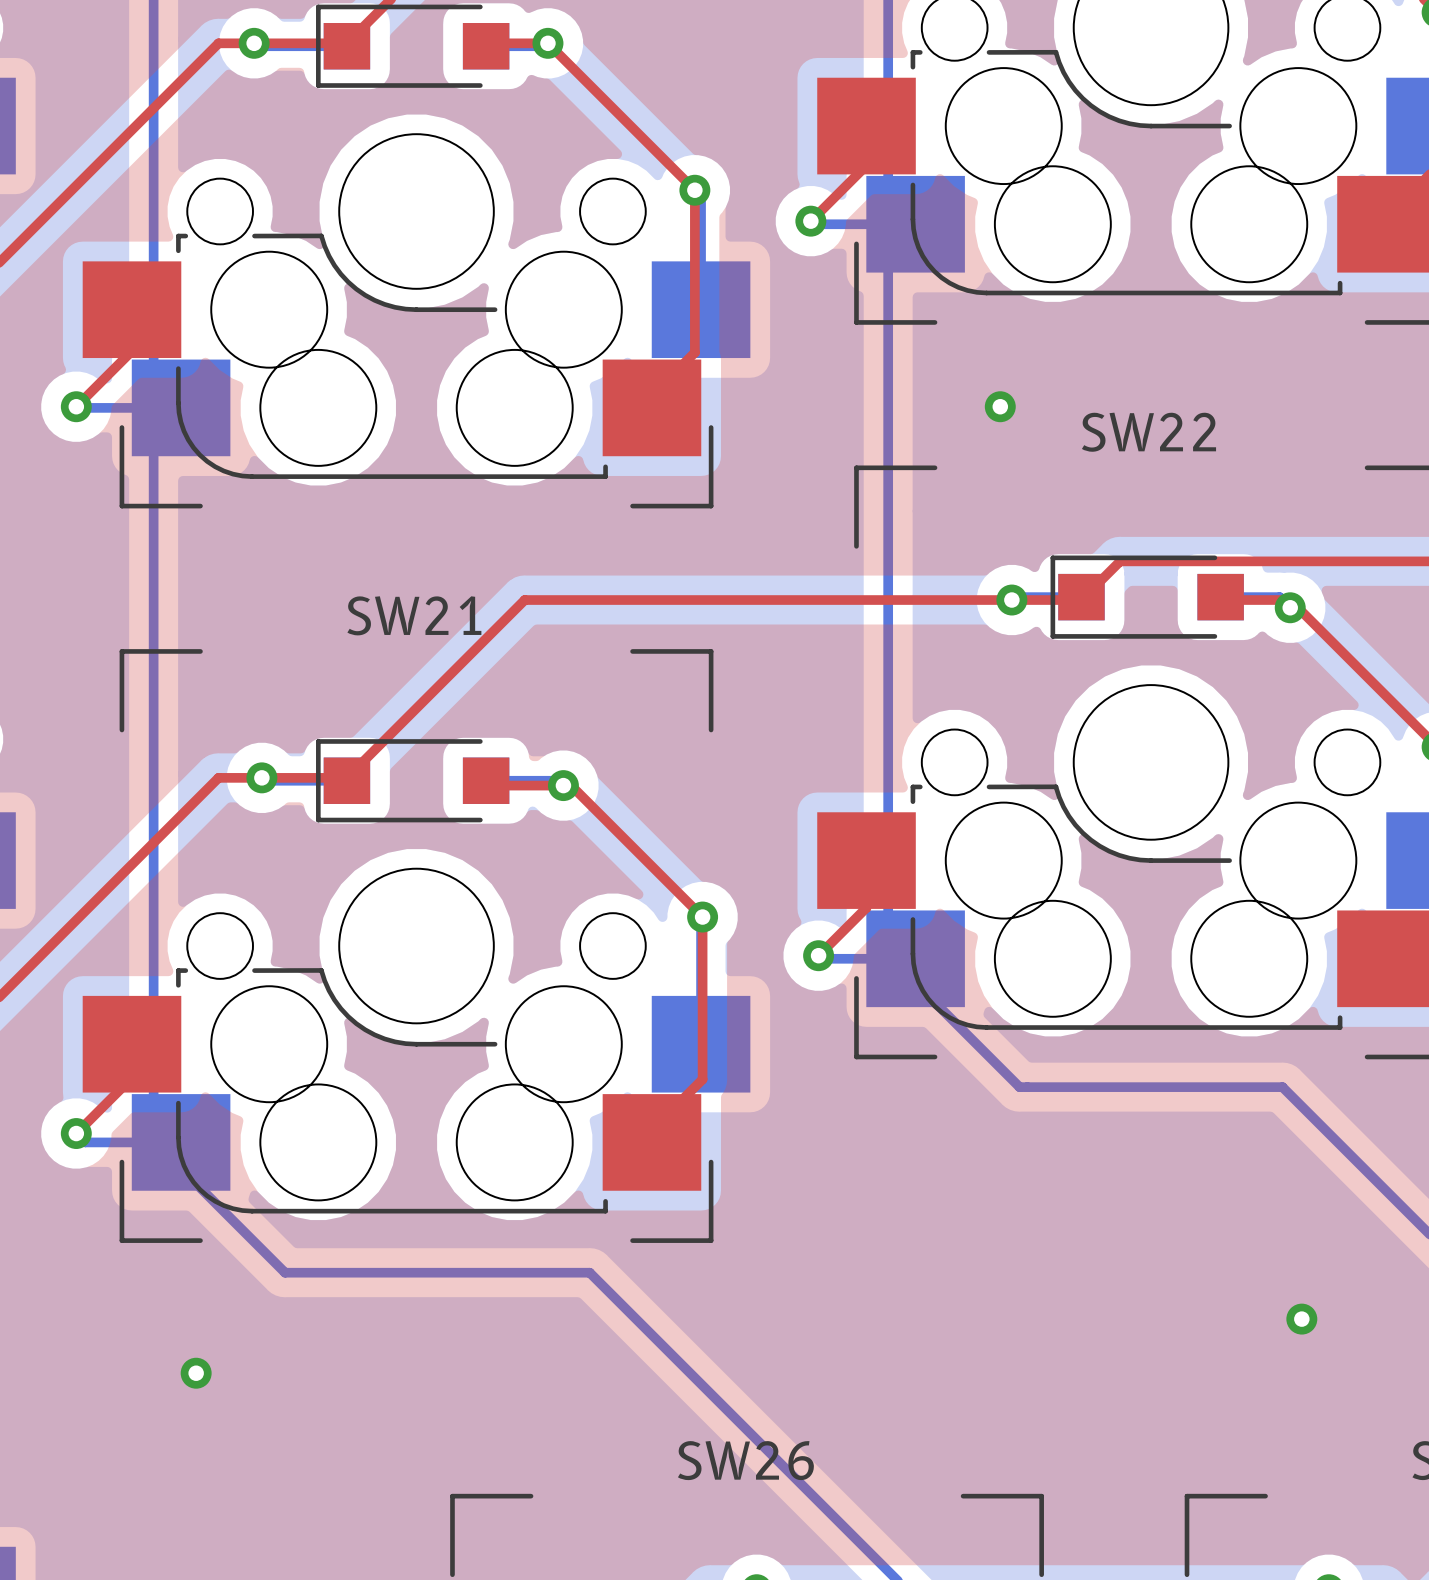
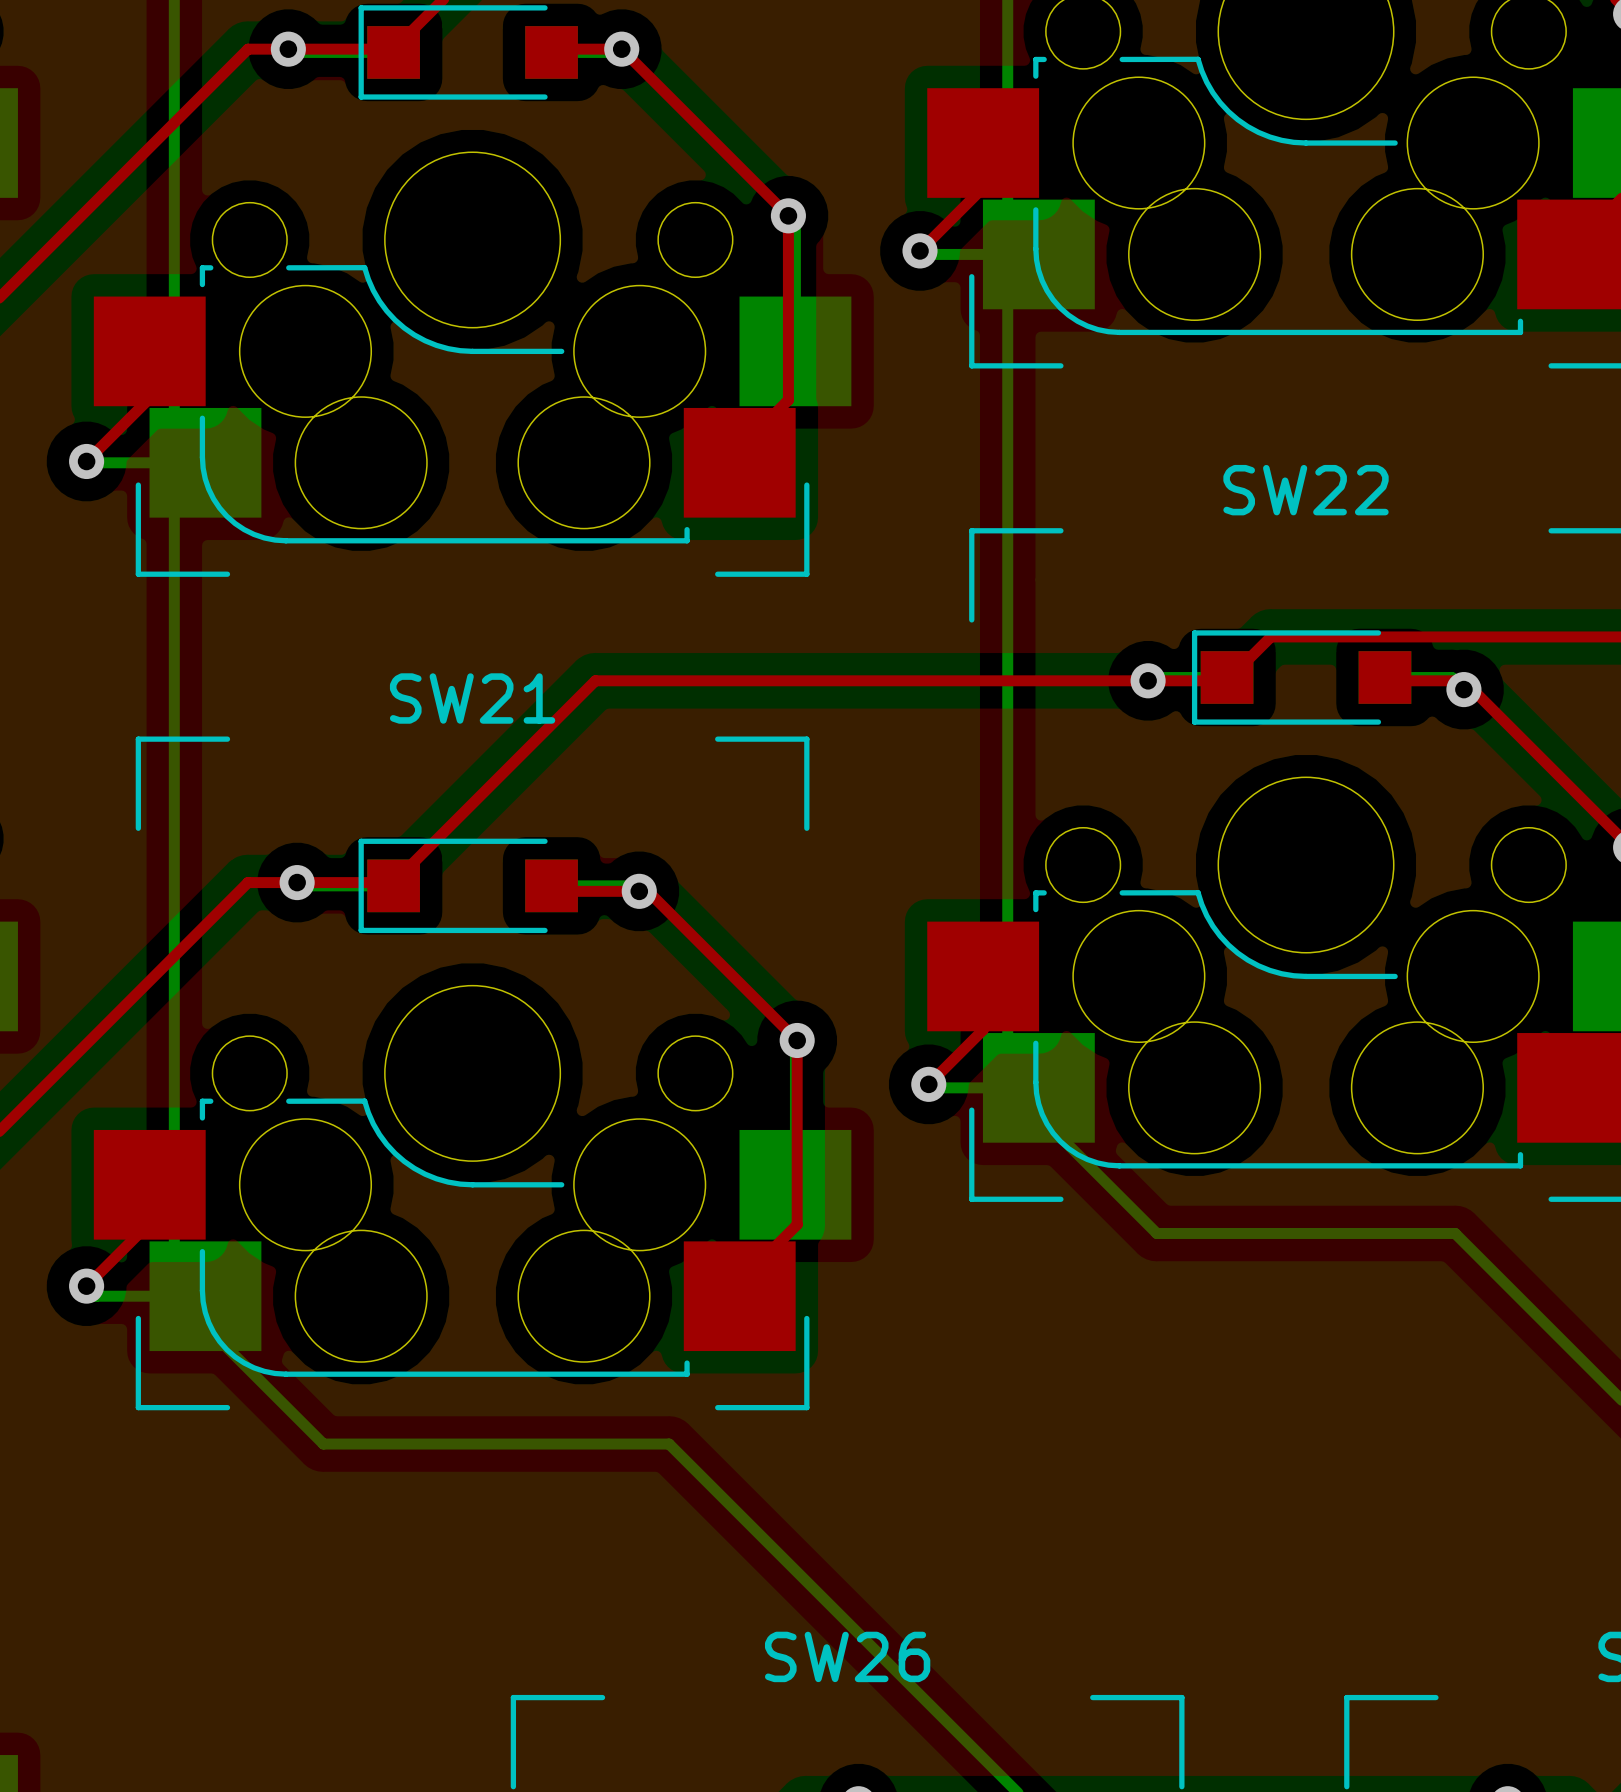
via: (1000, 406) -> none
via: (1301, 1319) -> none
via: (196, 1373) -> none

